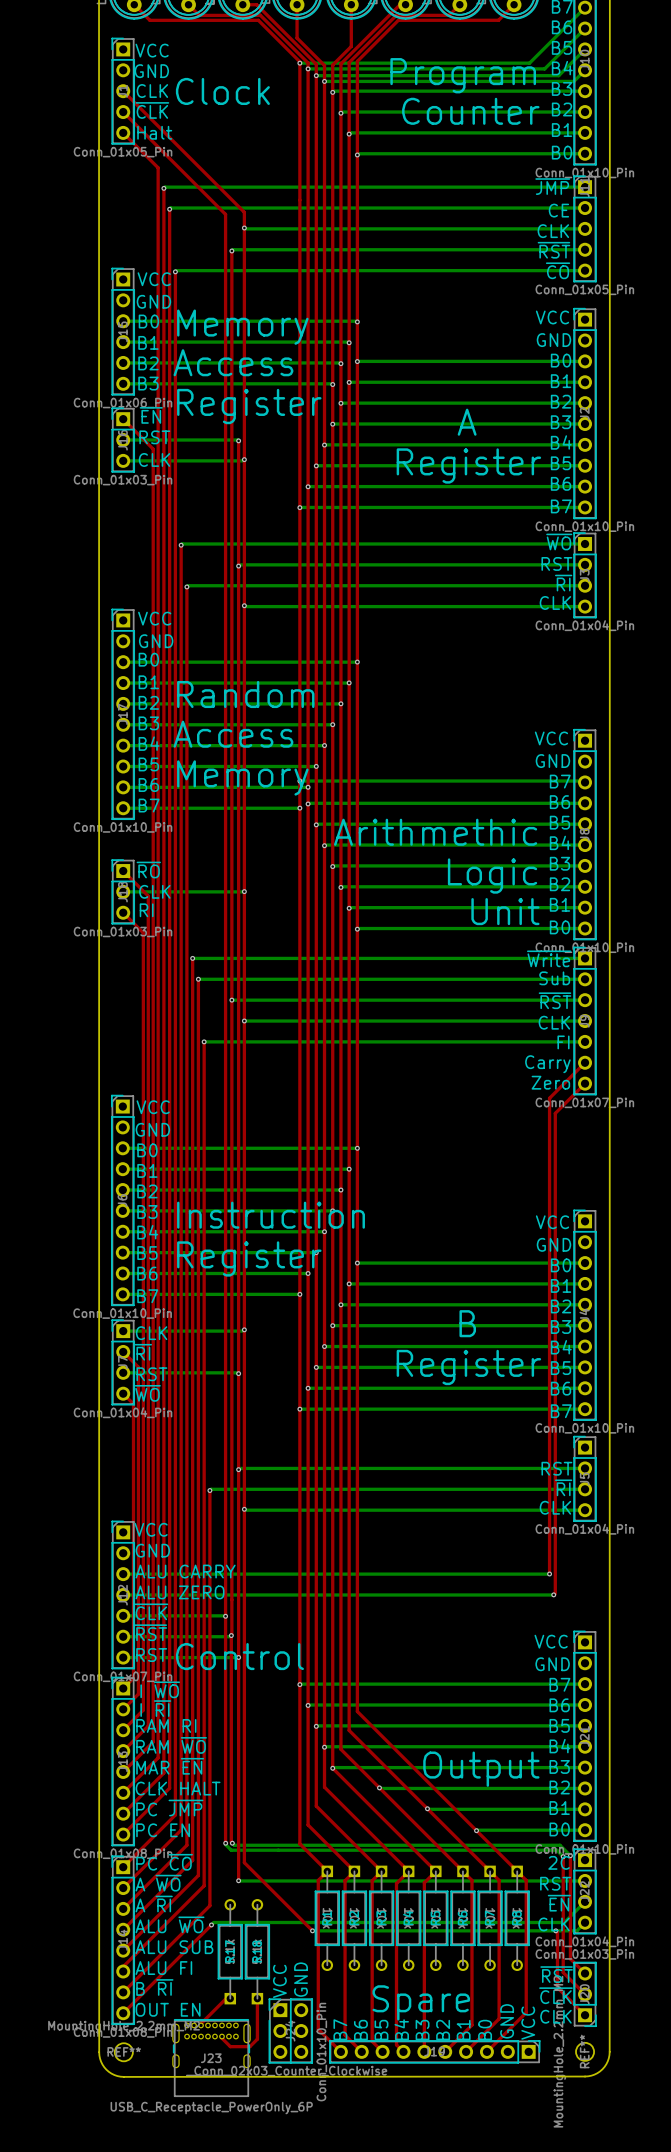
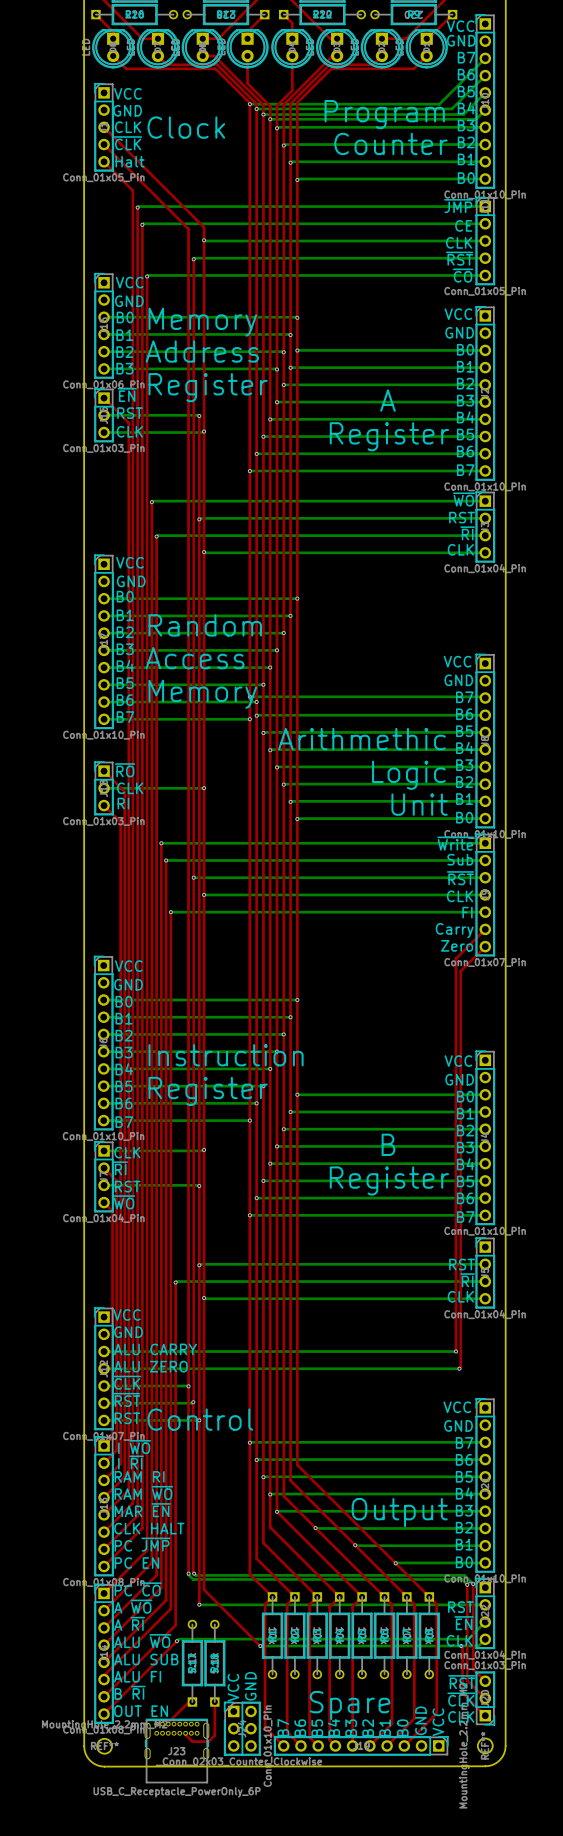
text: Access (233, 362) -> Address (202, 351)
text: 2C (559, 1862) -> none

